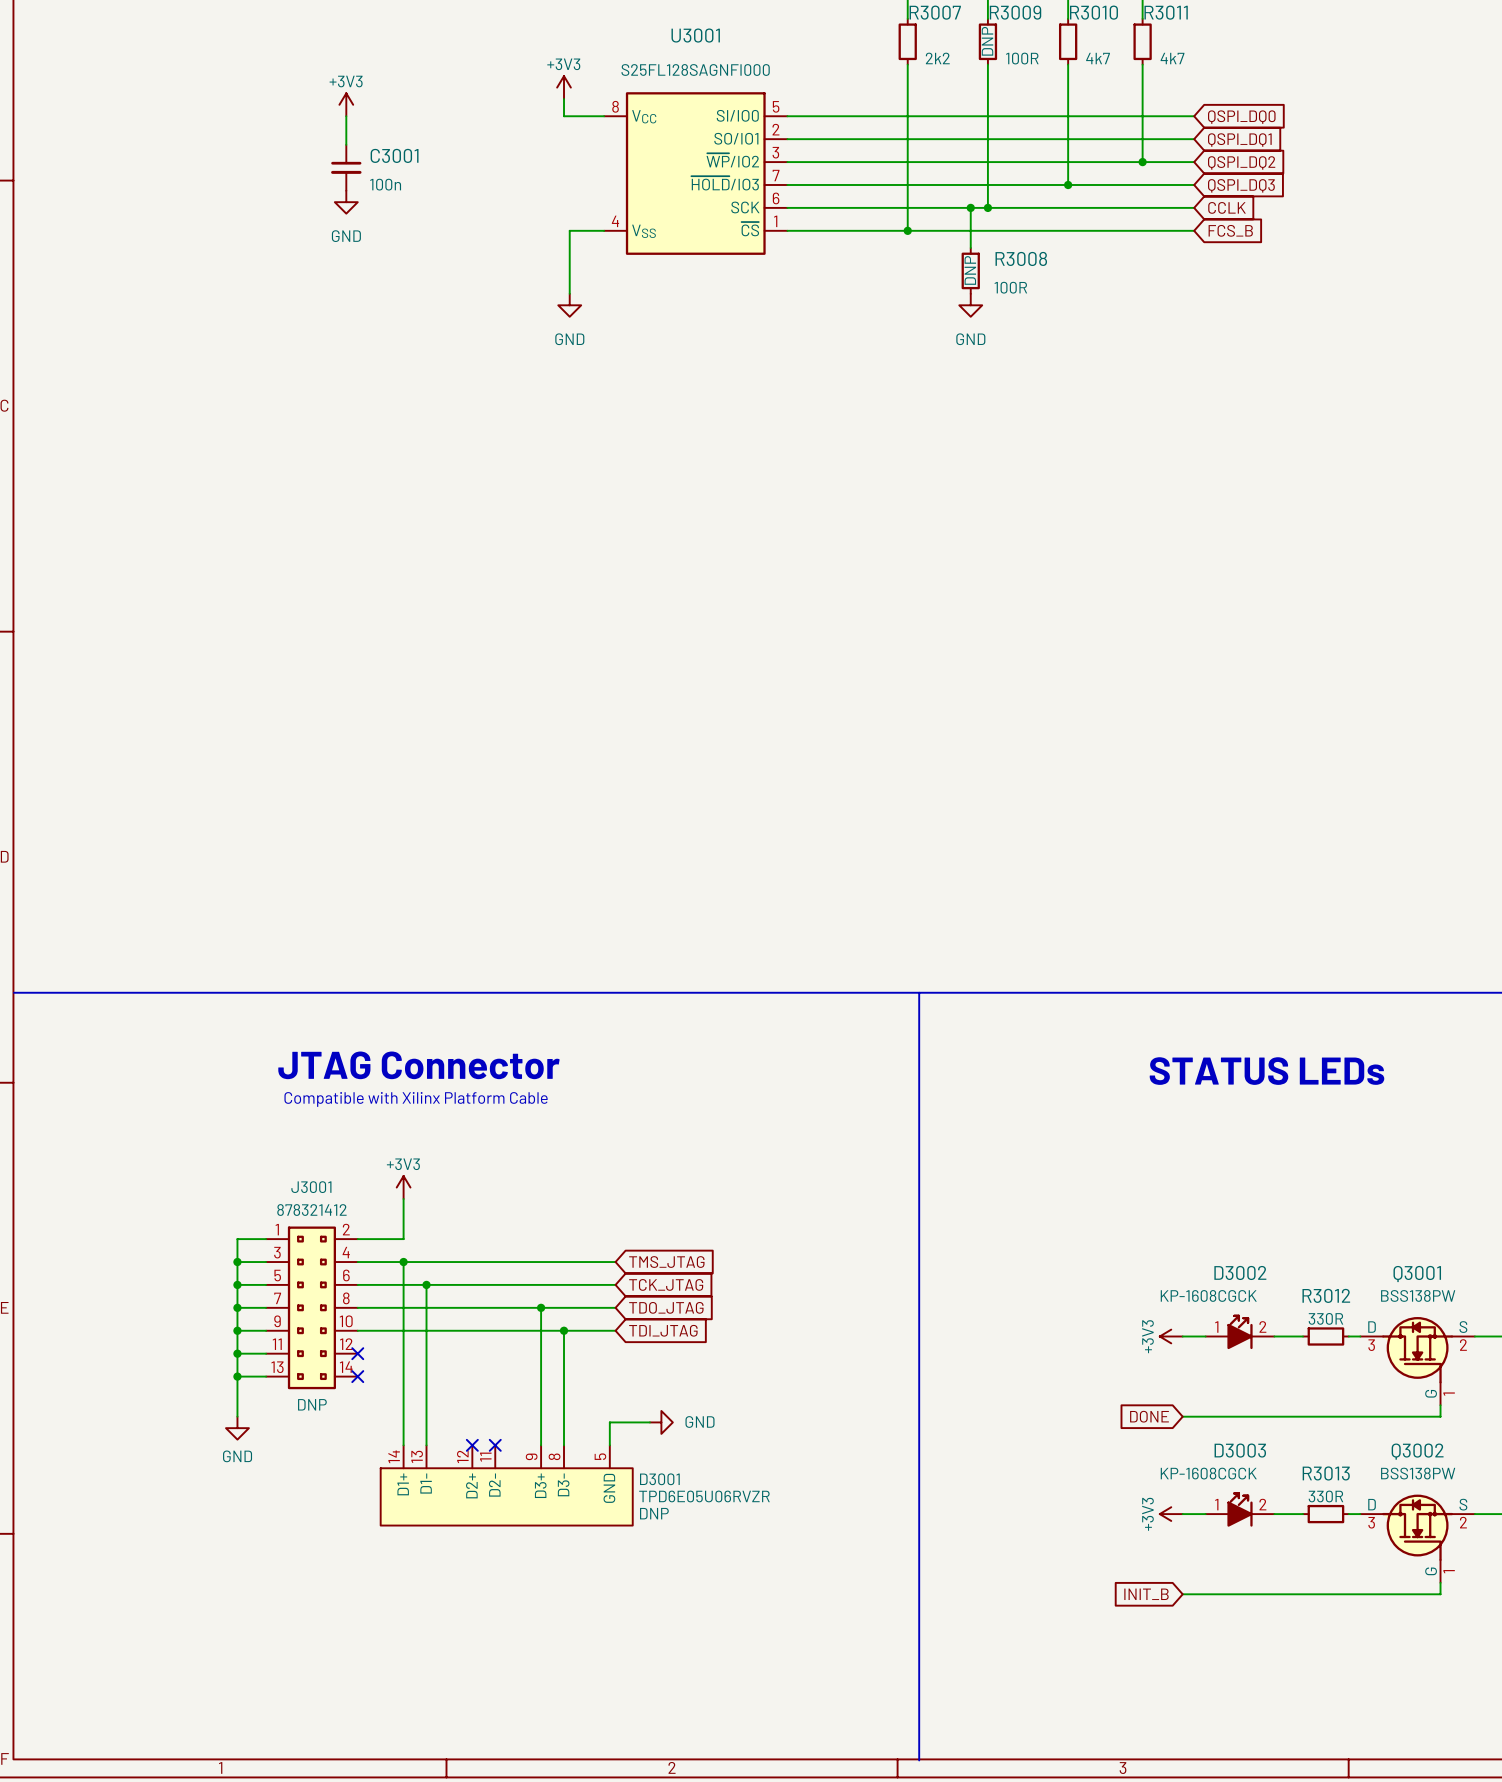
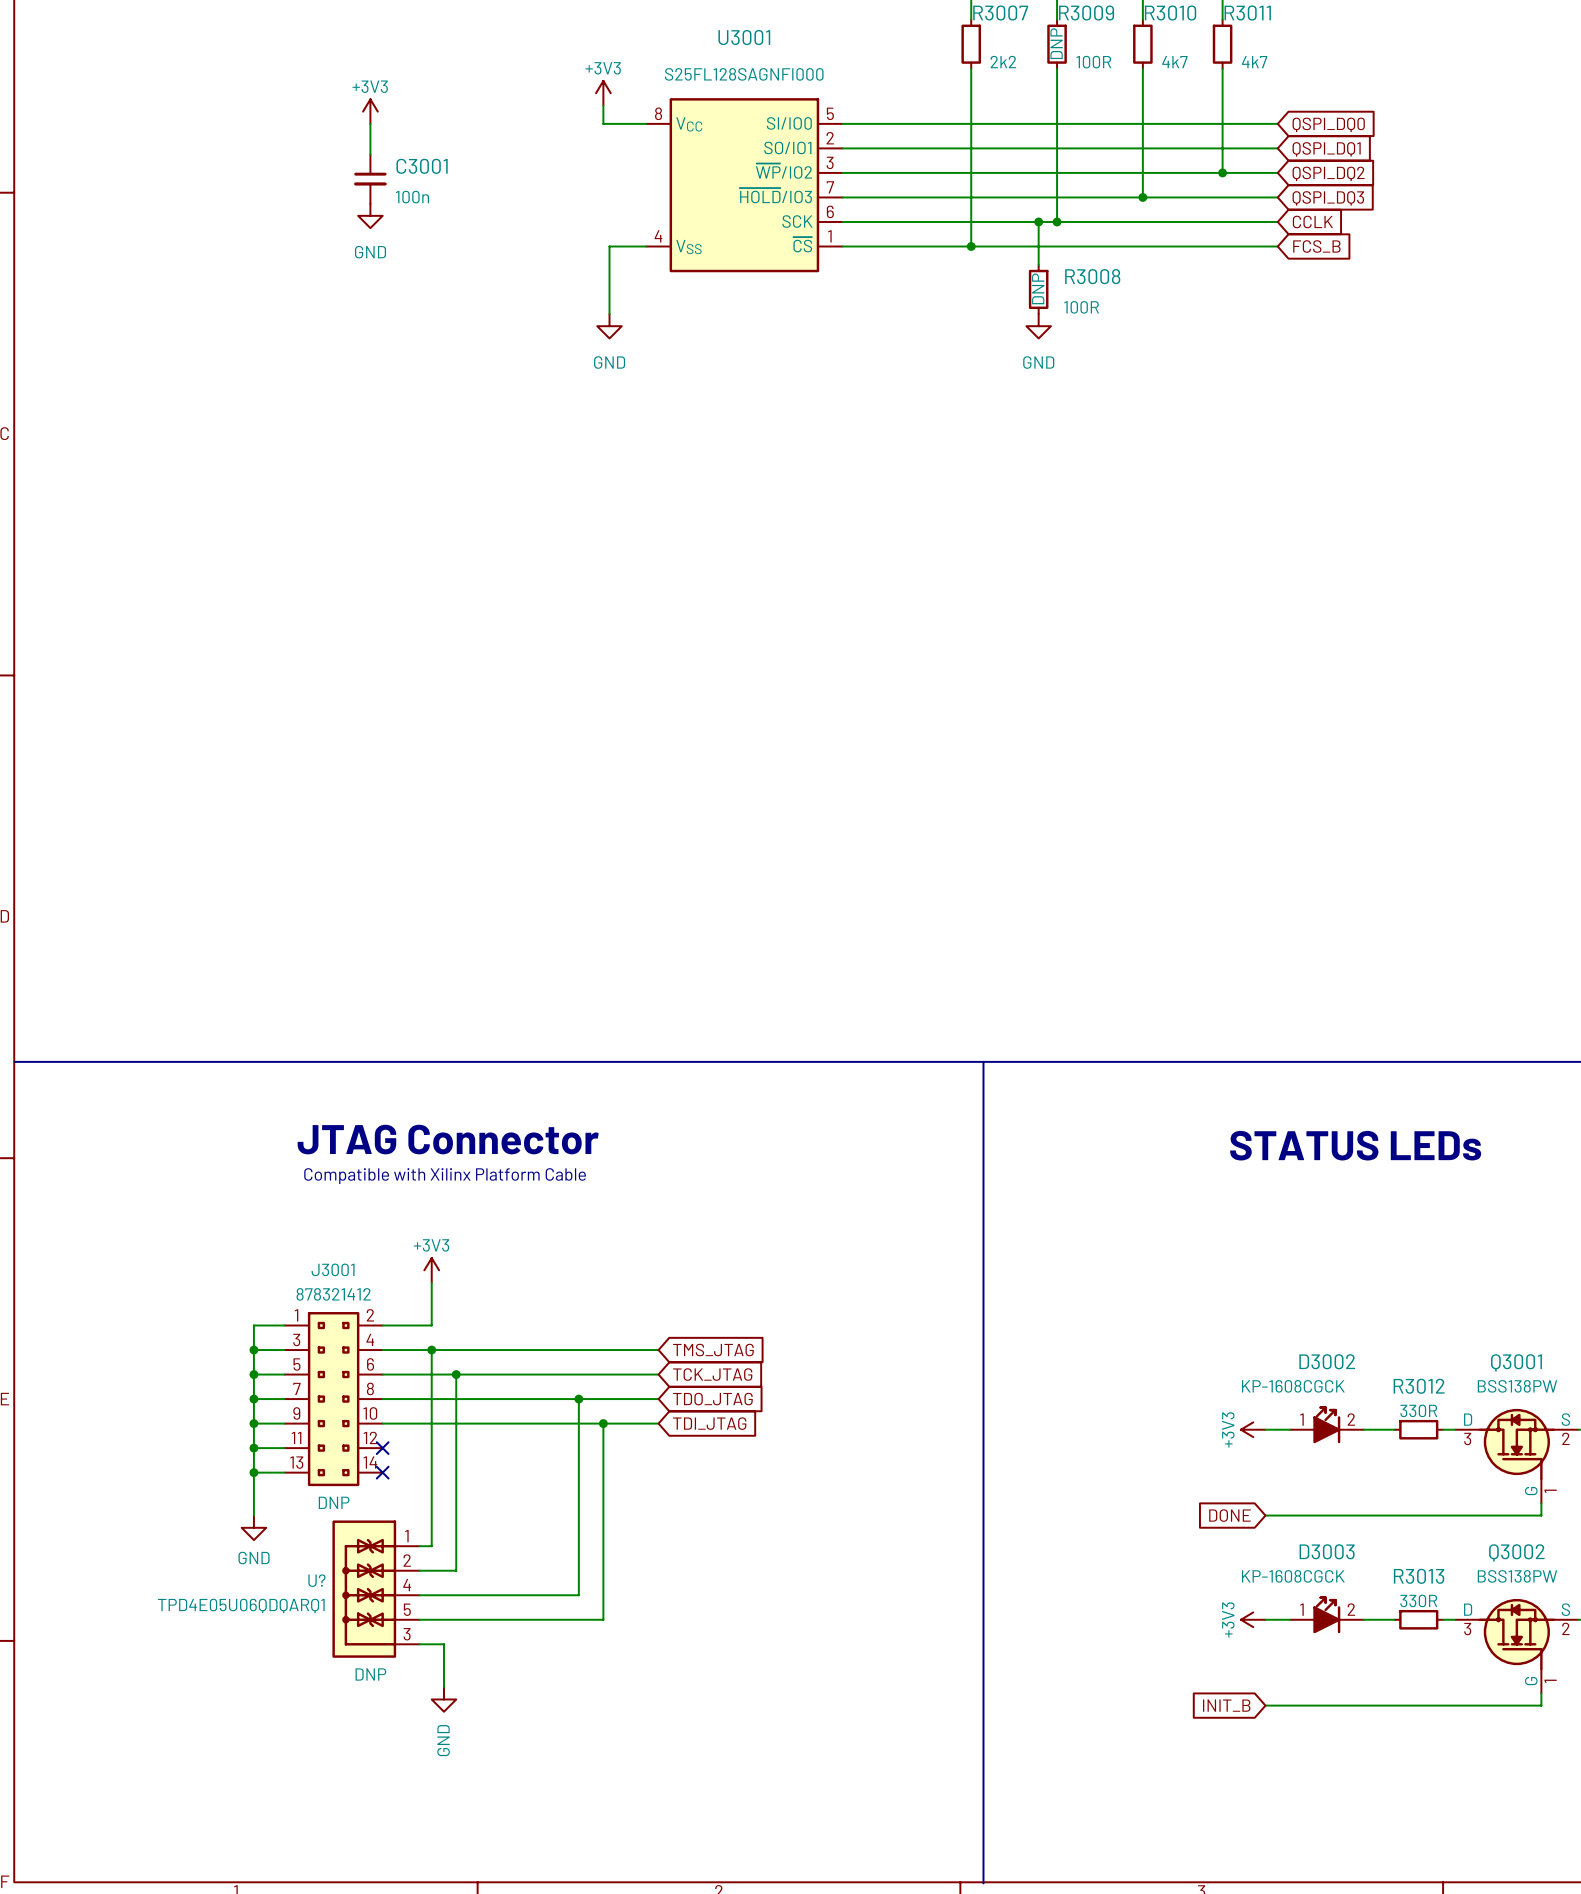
wire: (649, 1422) (609, 1422) (609, 1445) -> none
power symbol: GND (661, 1422) -> none
wire: none -> (419, 1546) (431, 1546)
no-connect mark: (472, 1445) -> none
no-connect mark: (495, 1445) -> none
U?: none -> TPD4E05U06QDQARQ1 (375, 1589)
D3001: TPD6E05U06RVZR (506, 1485) -> none
wire: none -> (419, 1644) (443, 1644) (443, 1687)
power symbol: none -> GND (443, 1699)

